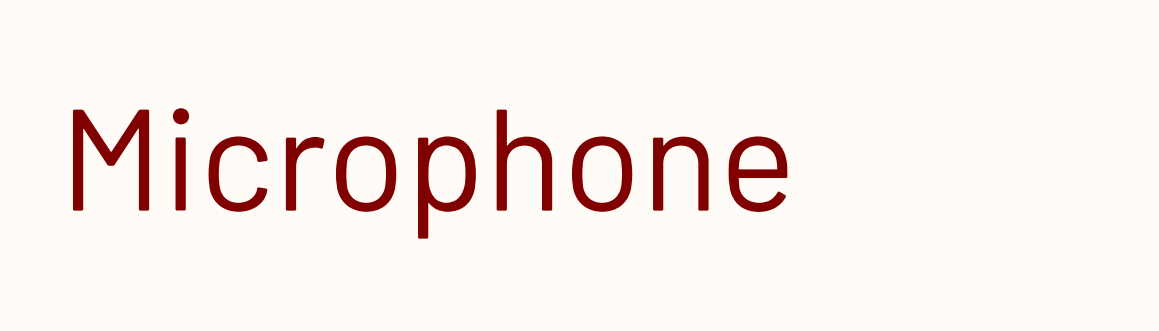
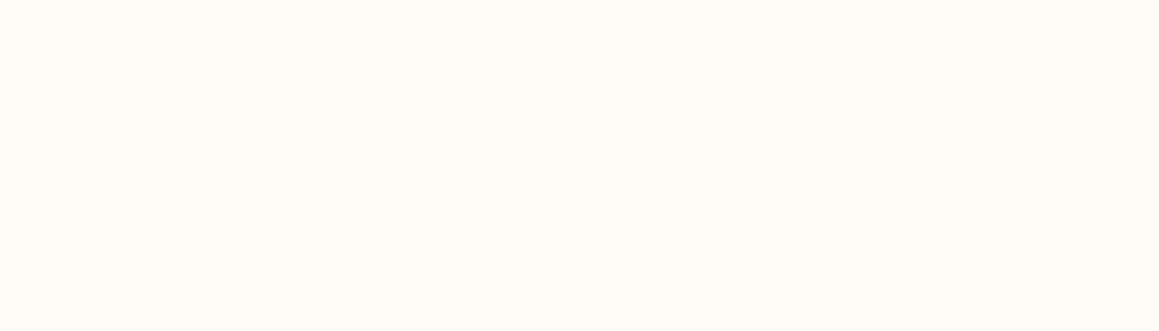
label: Microphone (430, 173) -> none

